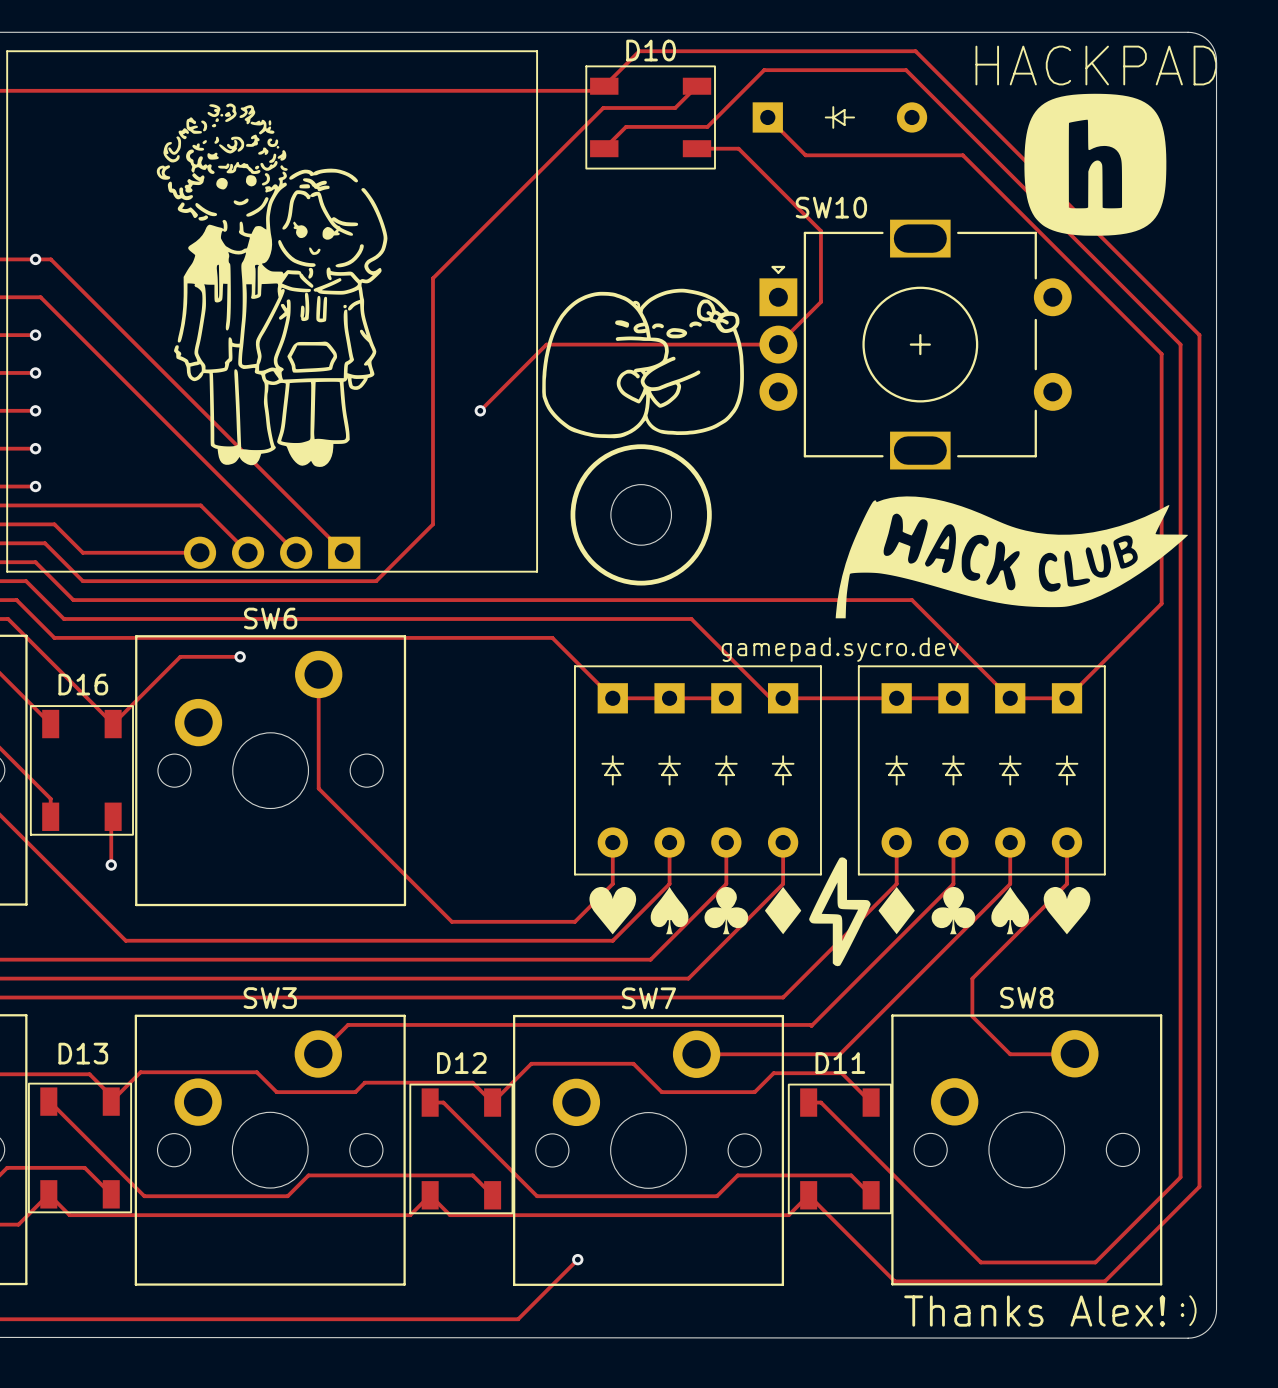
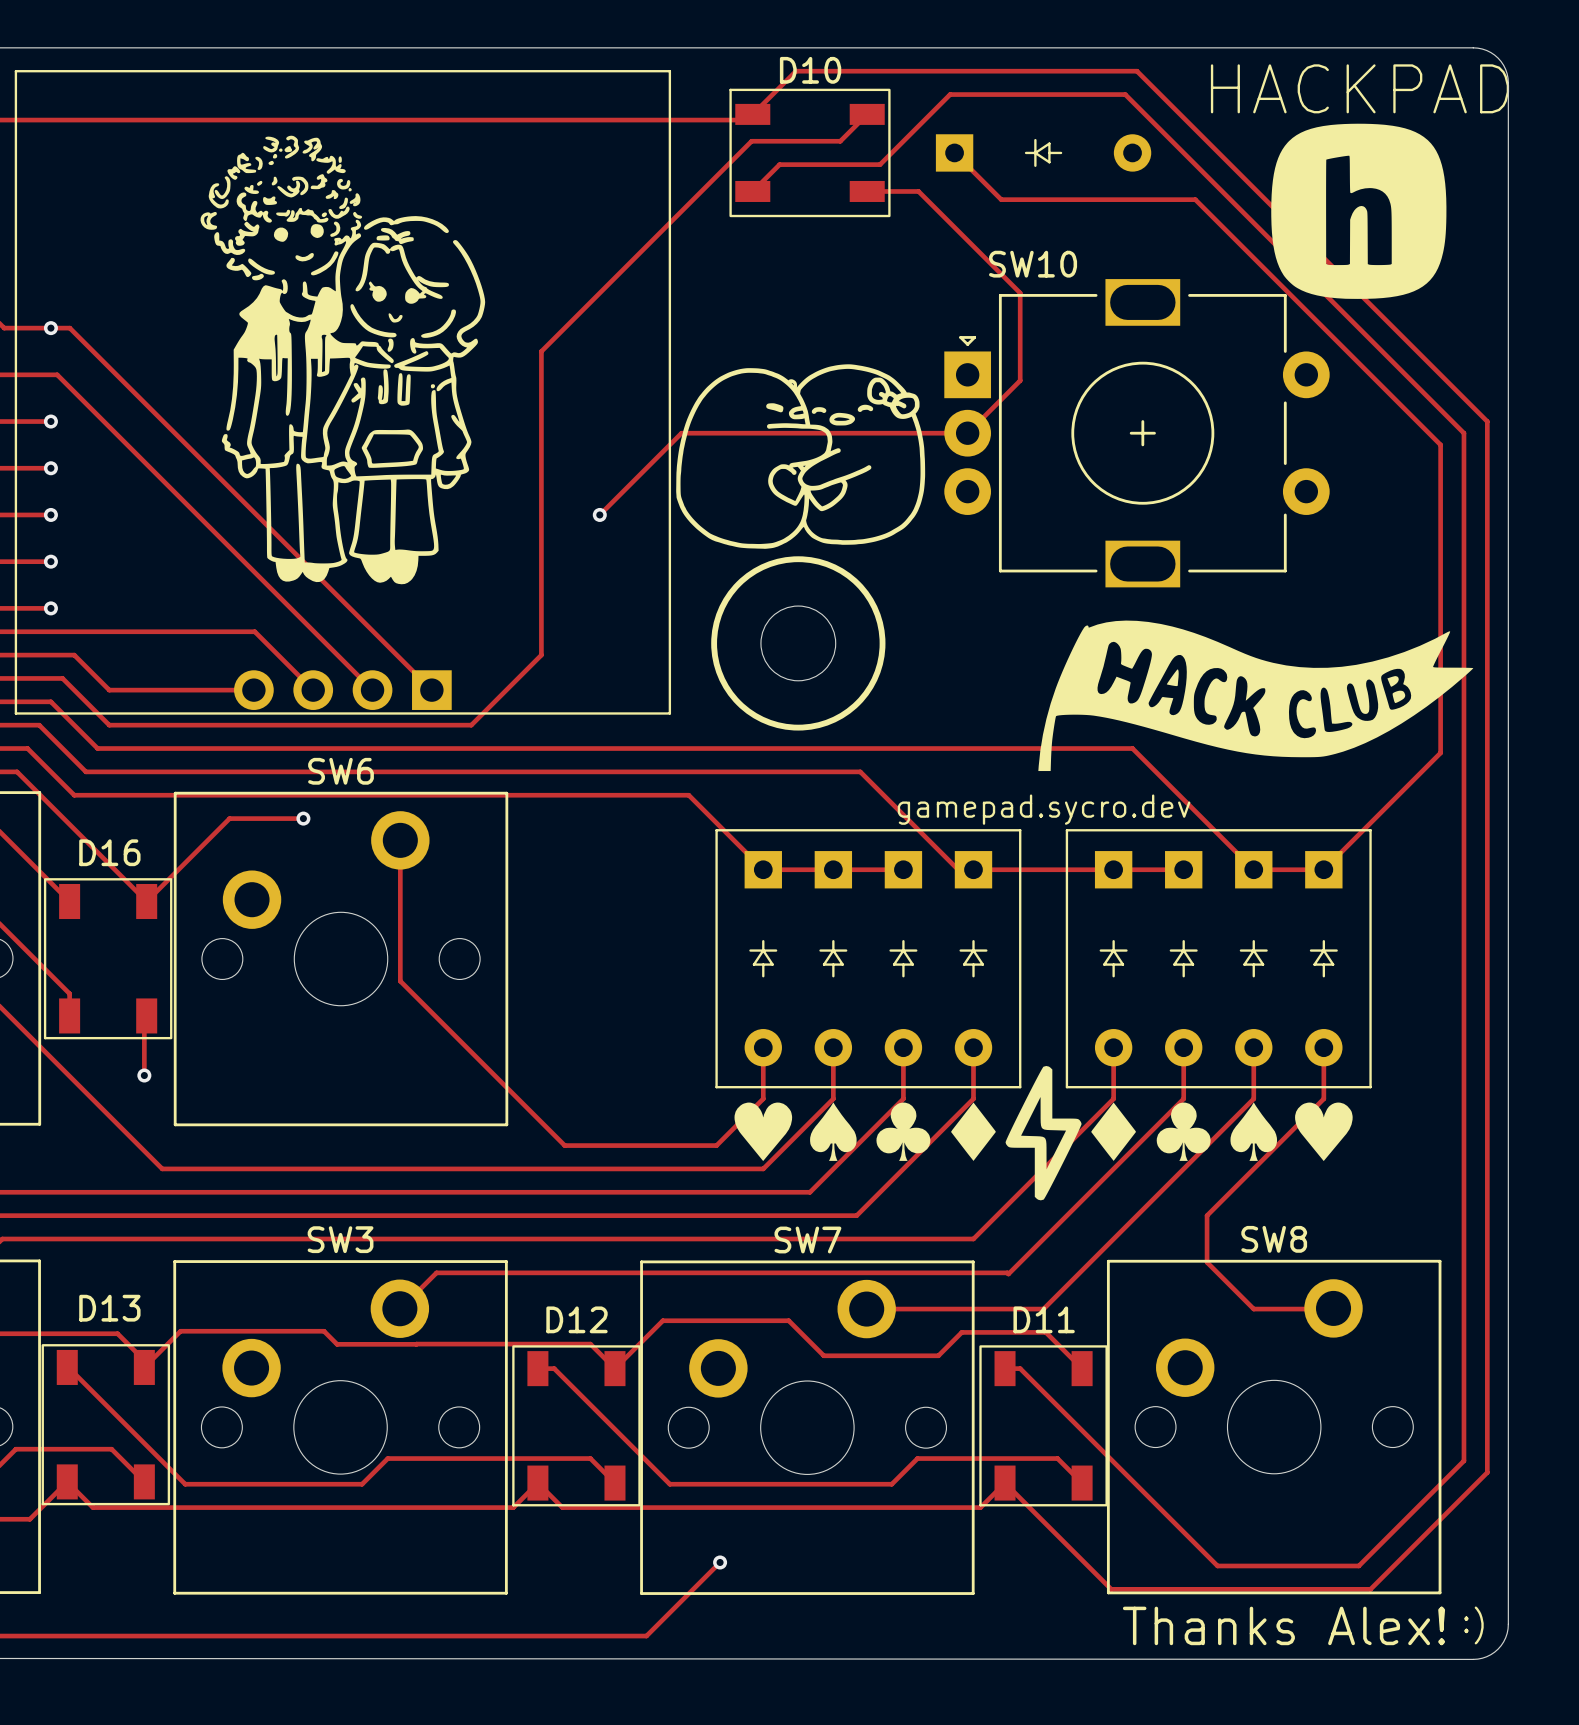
track: none -> (416, 1344) (457, 1344)
track: (364, 1082) (355, 1092) (276, 1092) (267, 1082) -> (416, 1344) (337, 1344)

